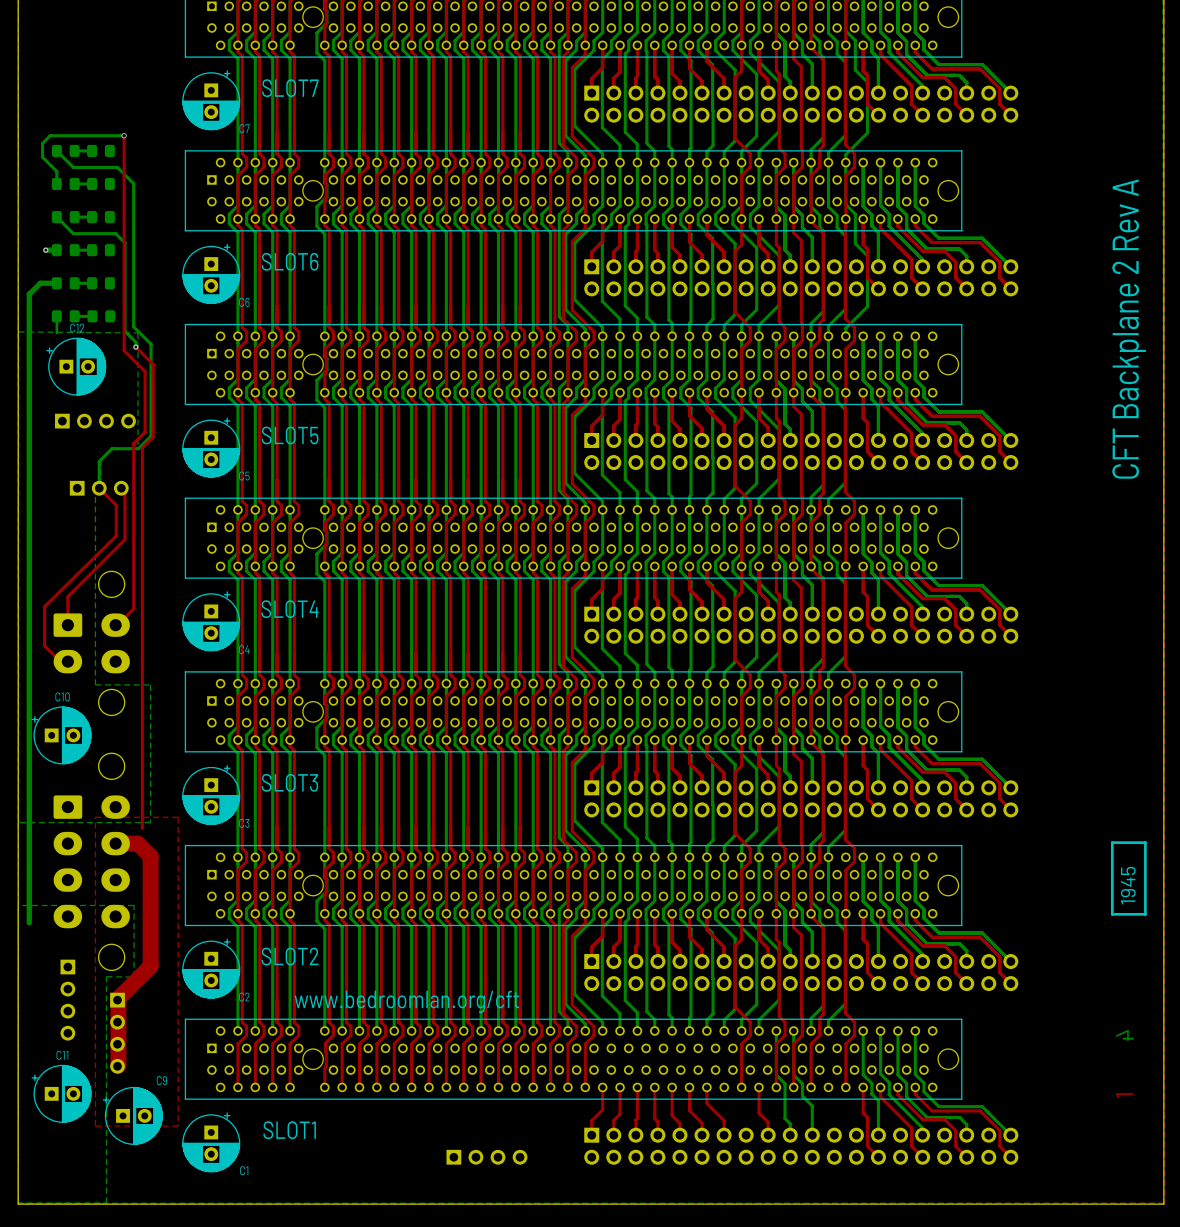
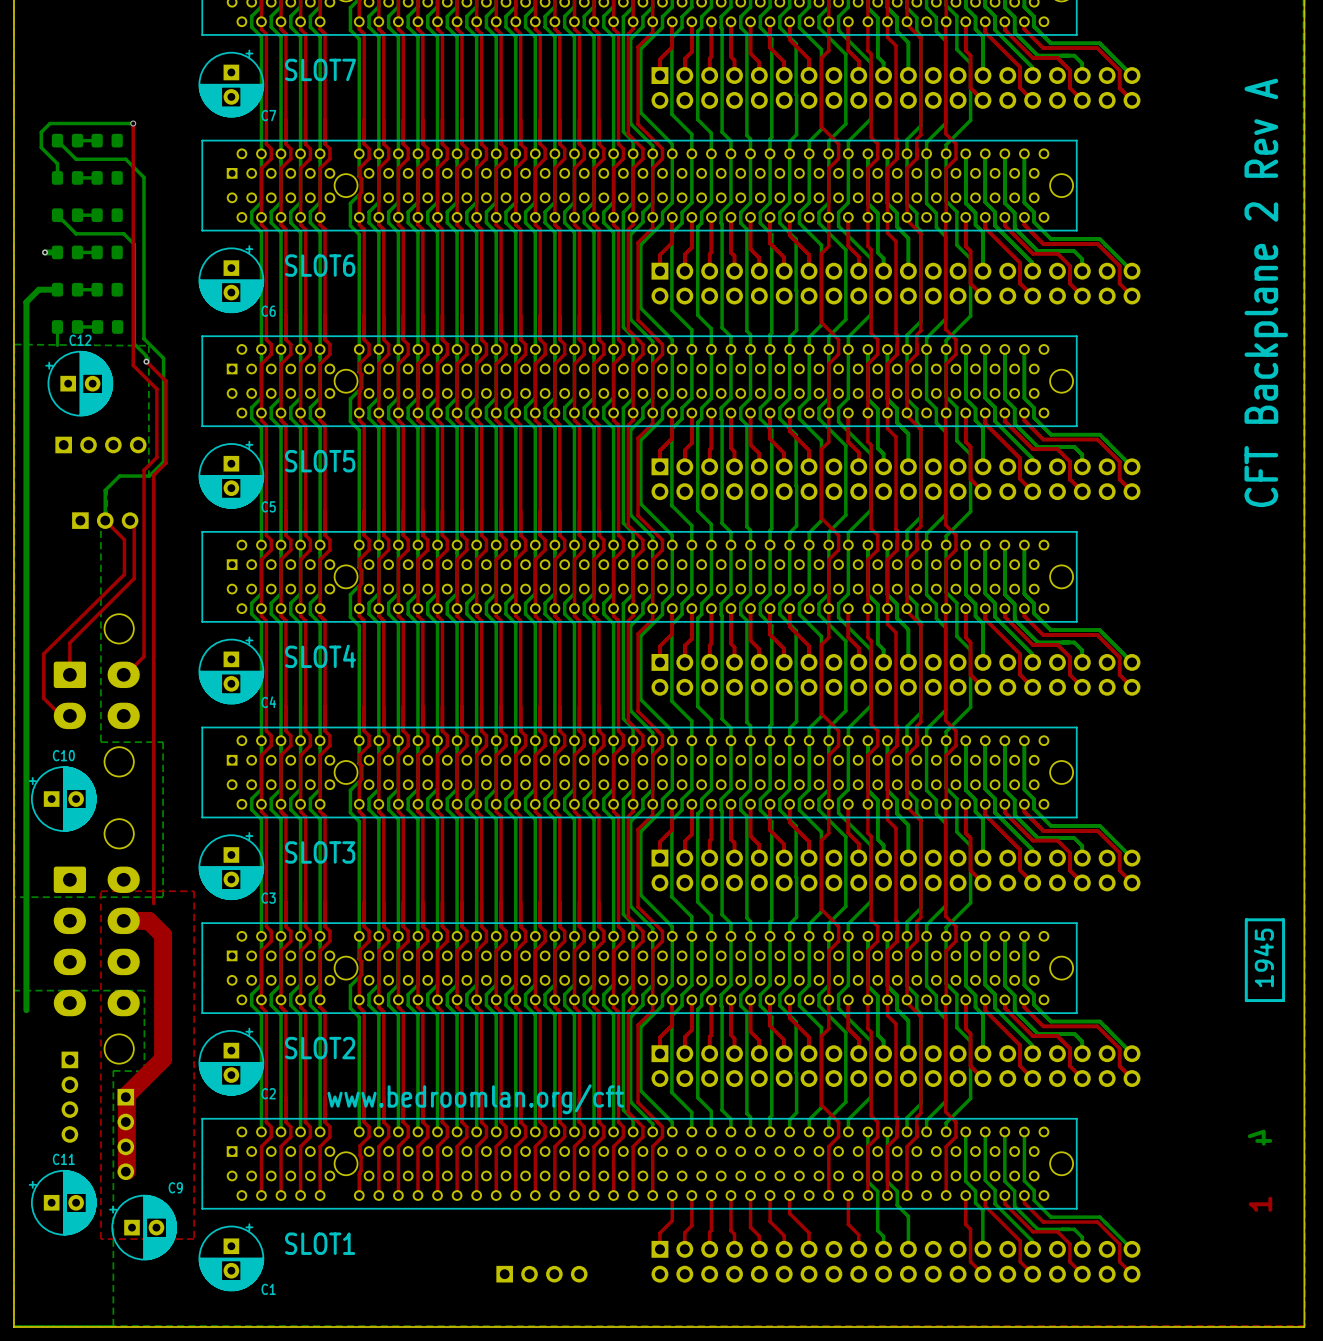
bottom track: none -> (946, 349) (946, 396) (956, 407) (956, 440) (970, 454) (970, 511) (946, 536) (946, 545)
bottom track: none -> (946, 545) (946, 592) (956, 603) (956, 636) (970, 650) (970, 707) (946, 731) (946, 740)
bottom track: none -> (946, 740) (946, 787) (956, 798) (956, 831) (970, 845) (970, 902) (946, 927) (946, 936)
bottom track: none -> (946, 936) (946, 983) (956, 994) (956, 1027) (970, 1041) (970, 1098) (946, 1122) (946, 1131)

